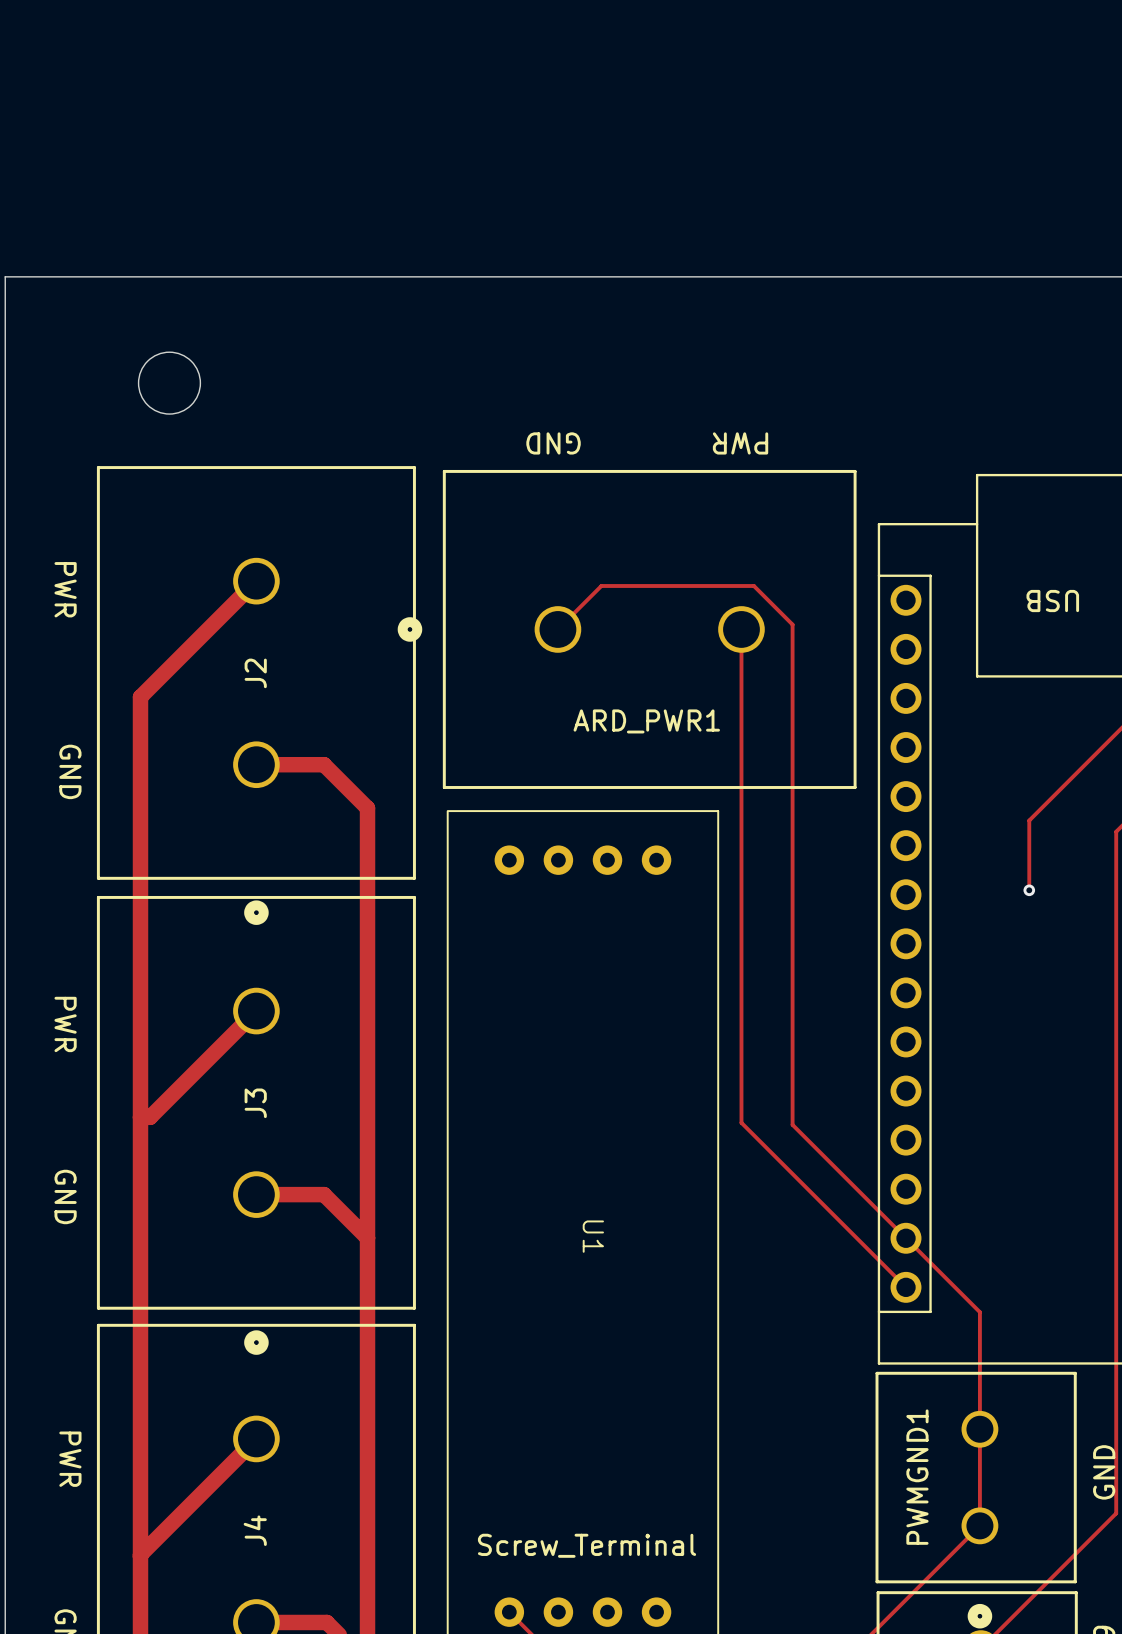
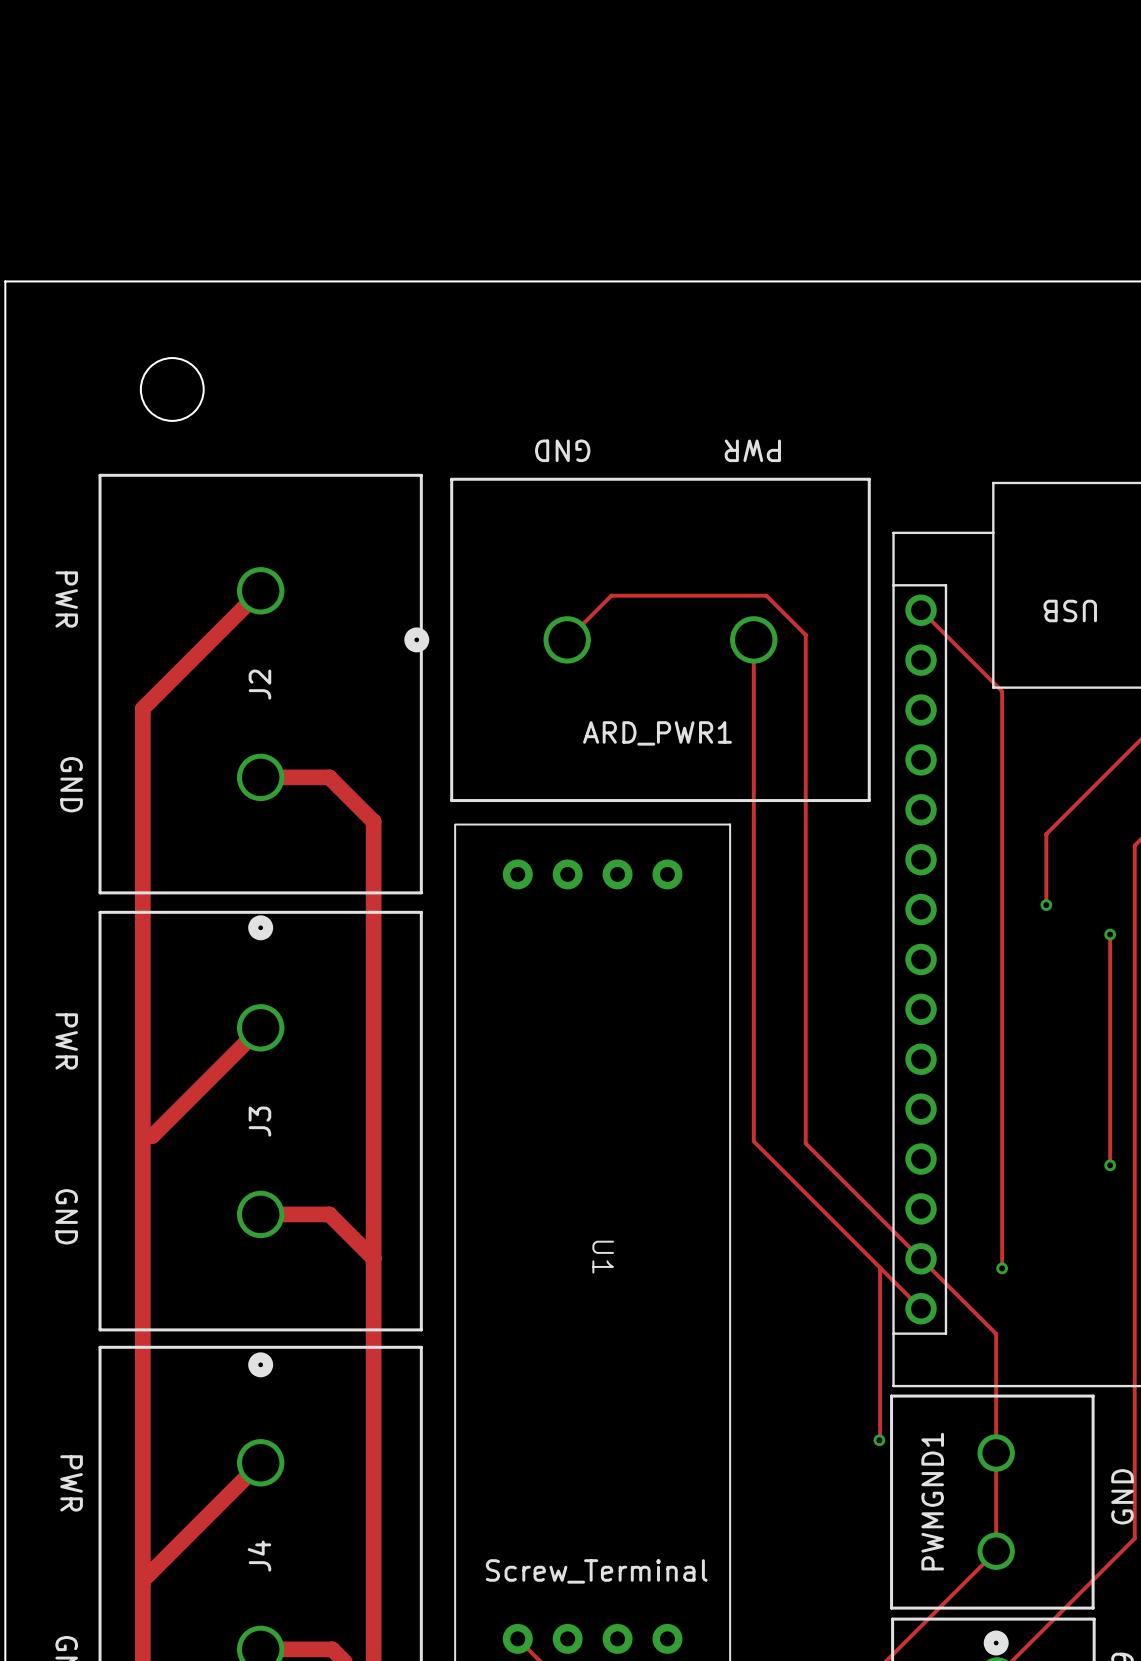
track: none -> (921, 610) (1002, 691) (1002, 1268)
track: none -> (1110, 934) (1110, 1165)
via: none -> (1110, 934)
via: none -> (1110, 1165)
track: none -> (880, 1267) (879, 1440)
via: none -> (1002, 1268)
via: none -> (879, 1440)

